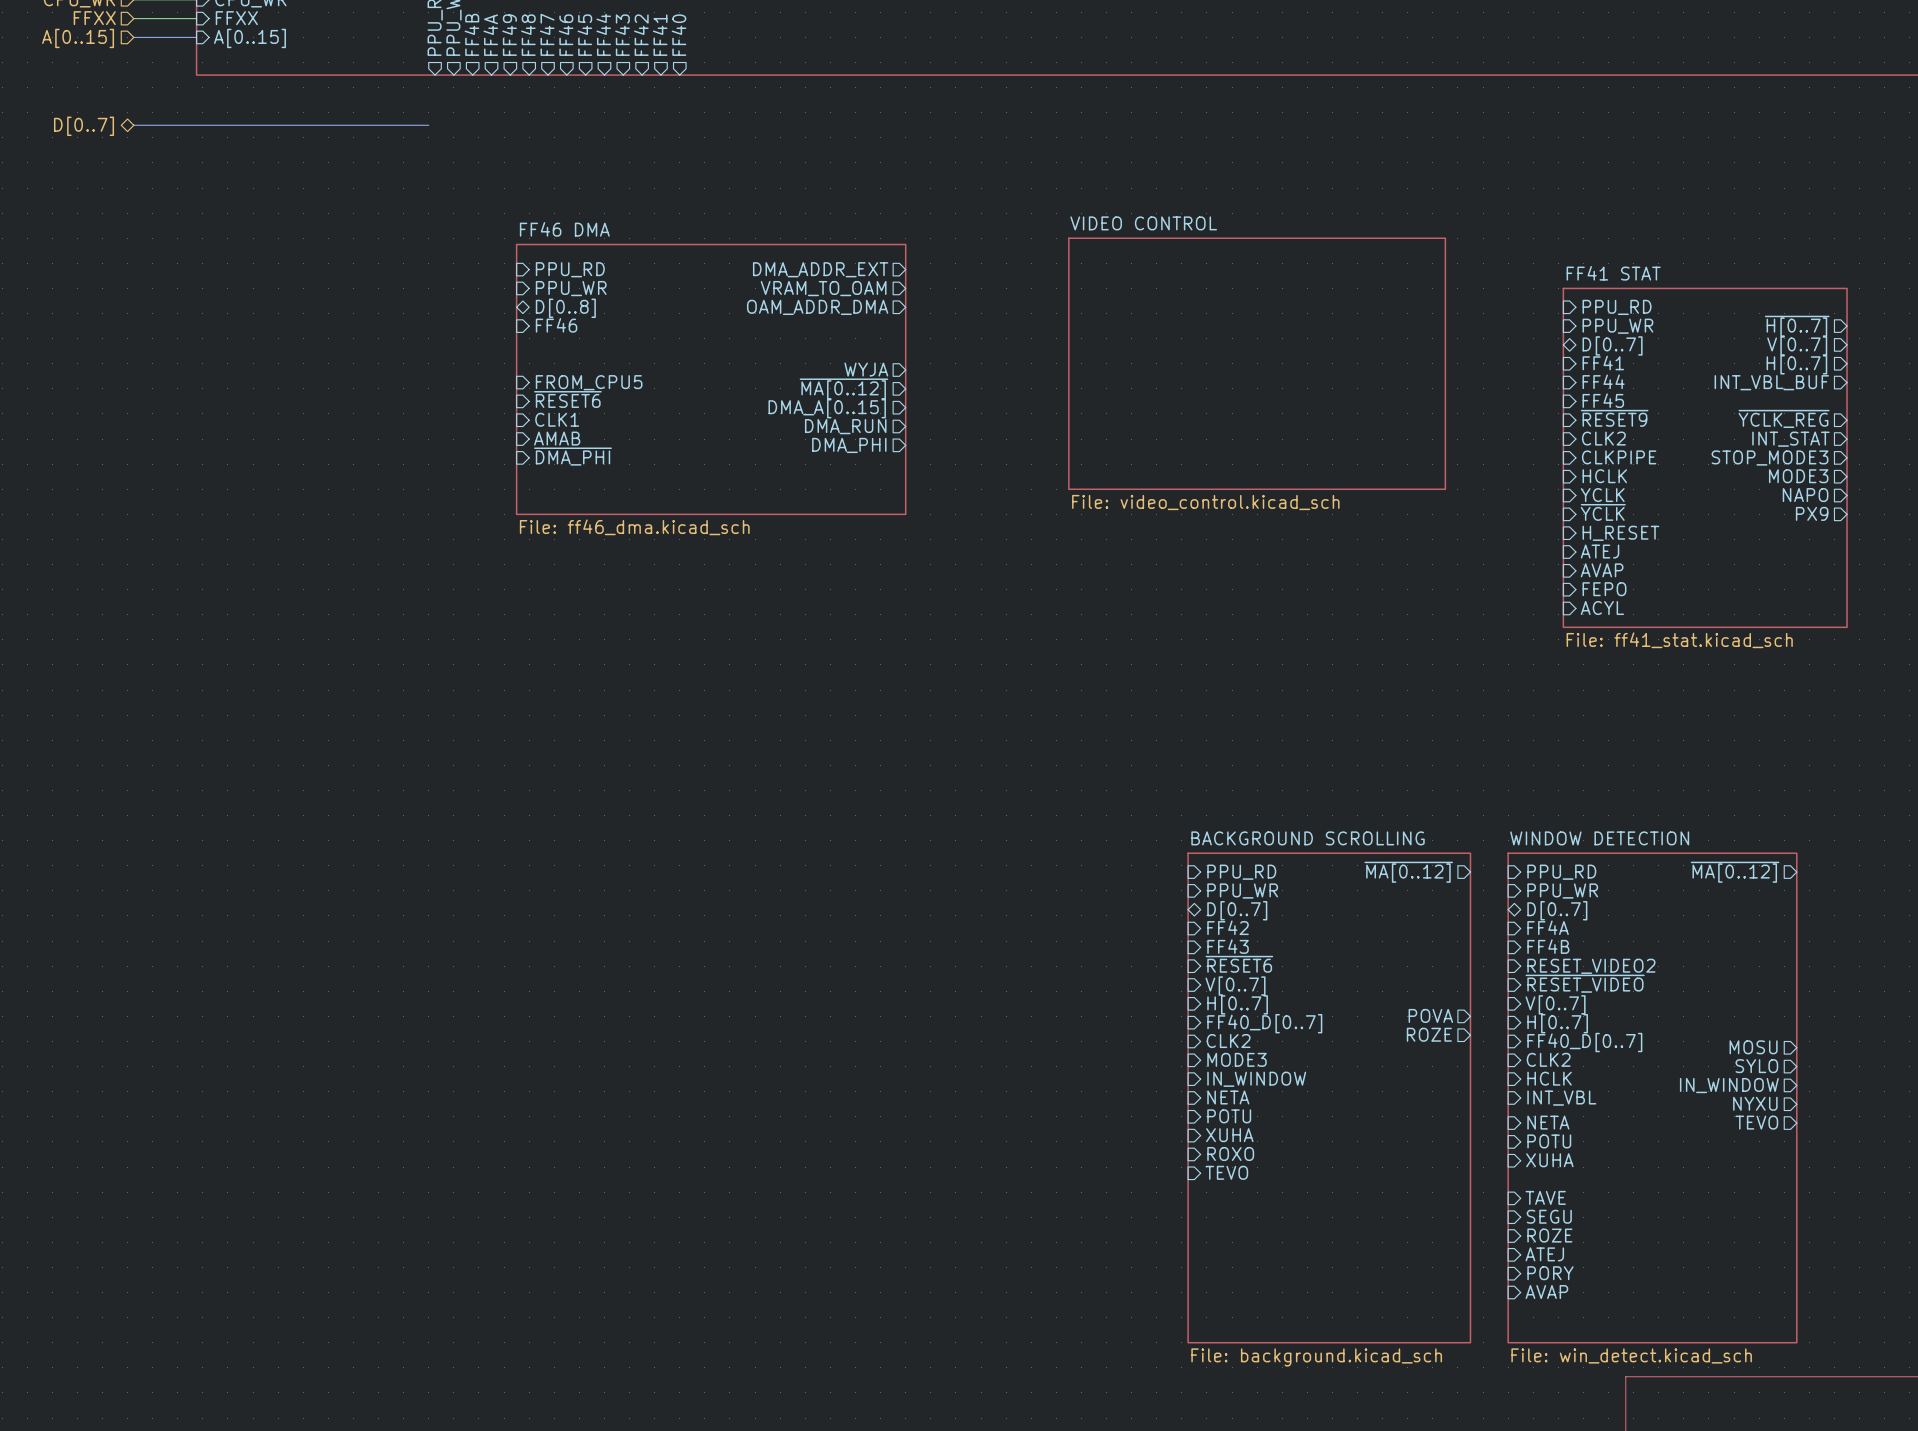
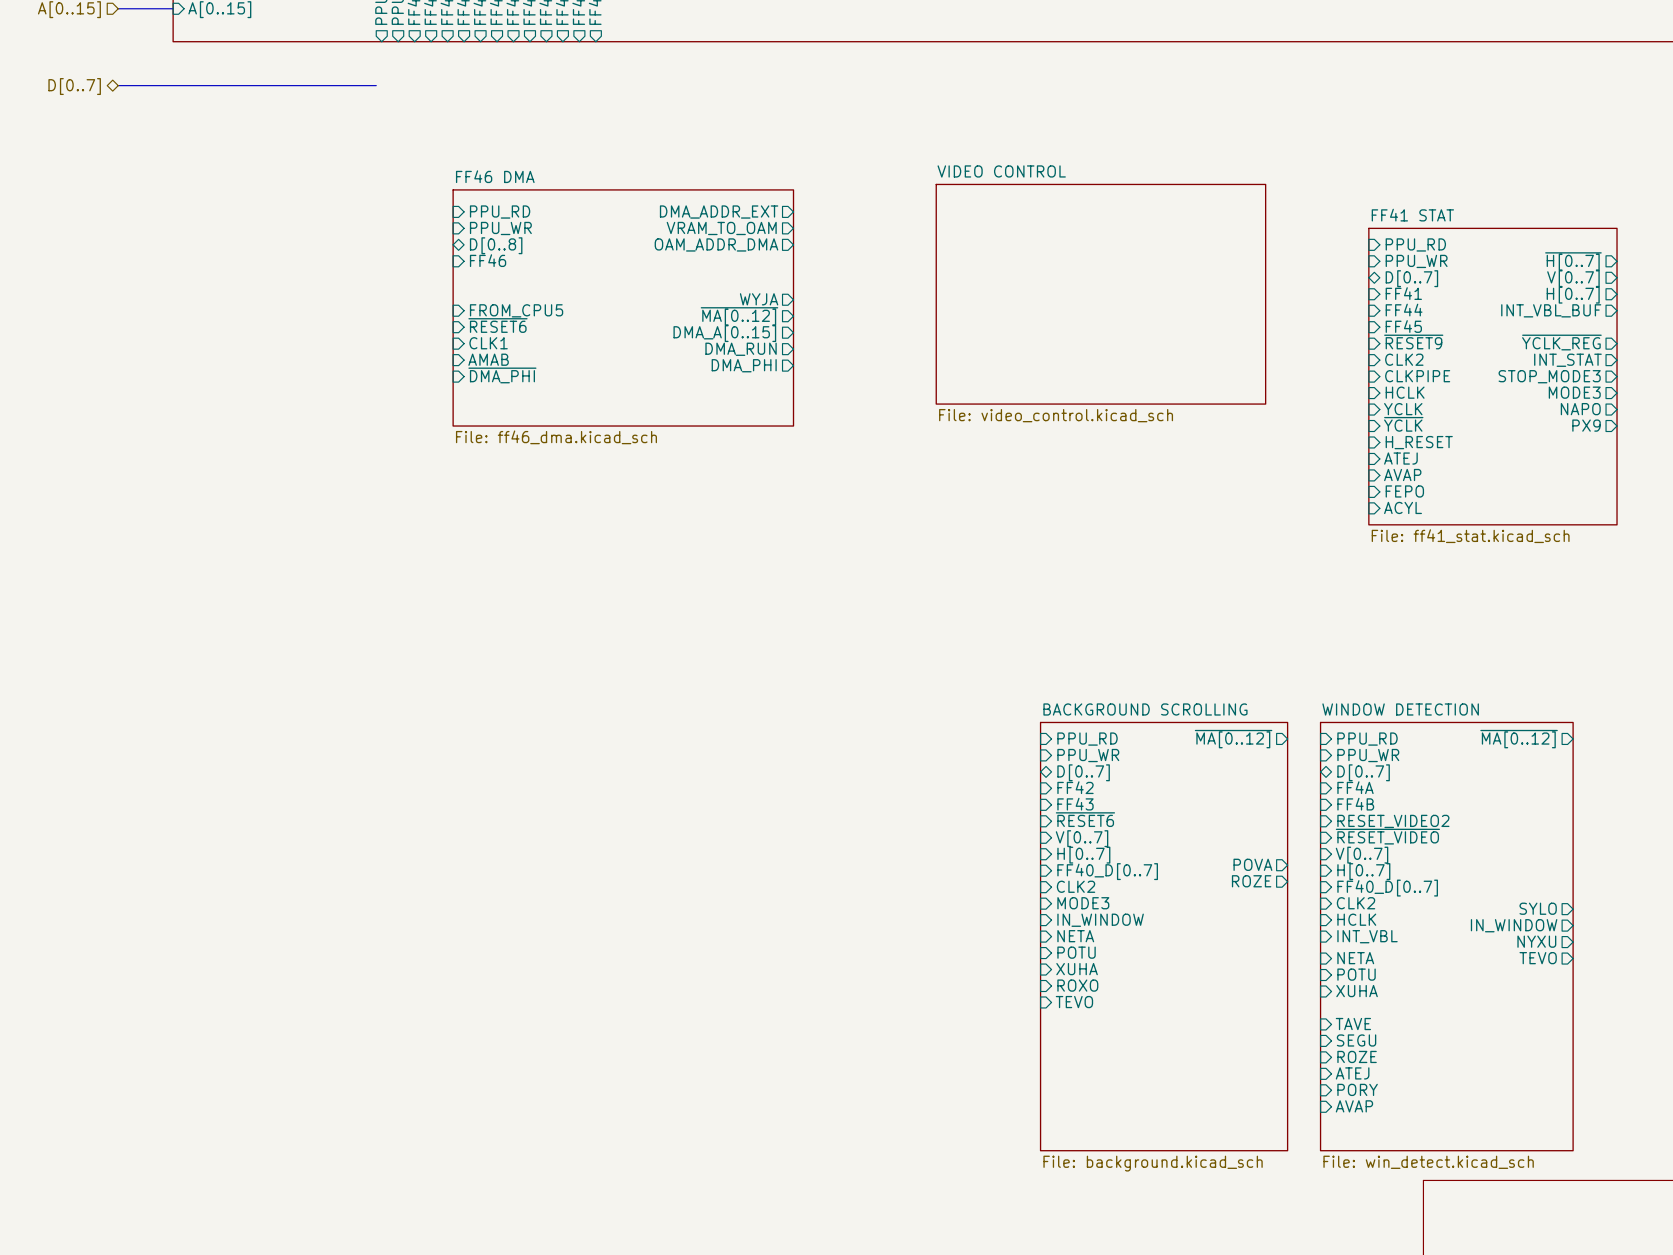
sheet pin: MOSU (1753, 1047) -> none

